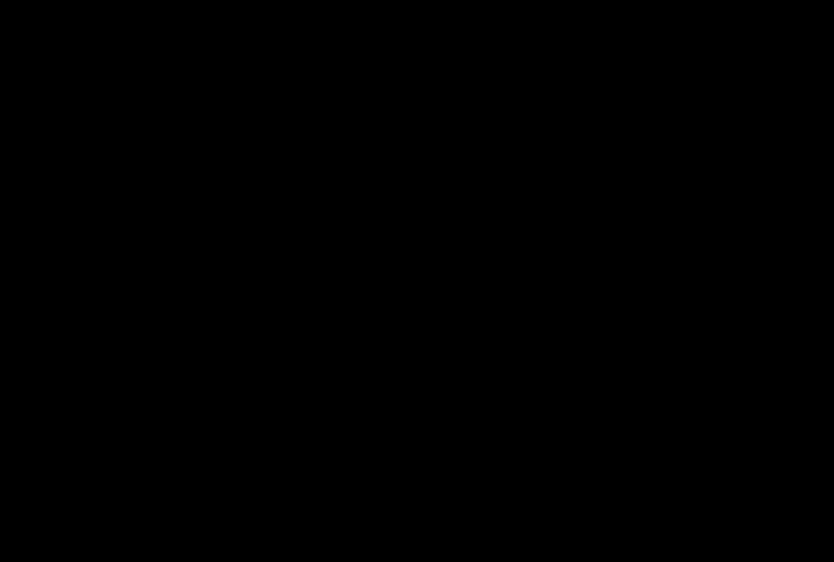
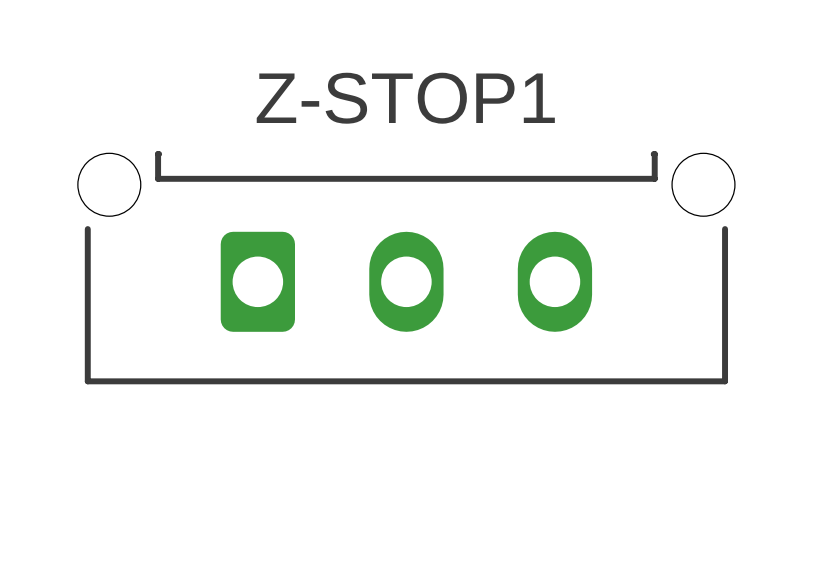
Z-STOP1: none -> (406, 267)

